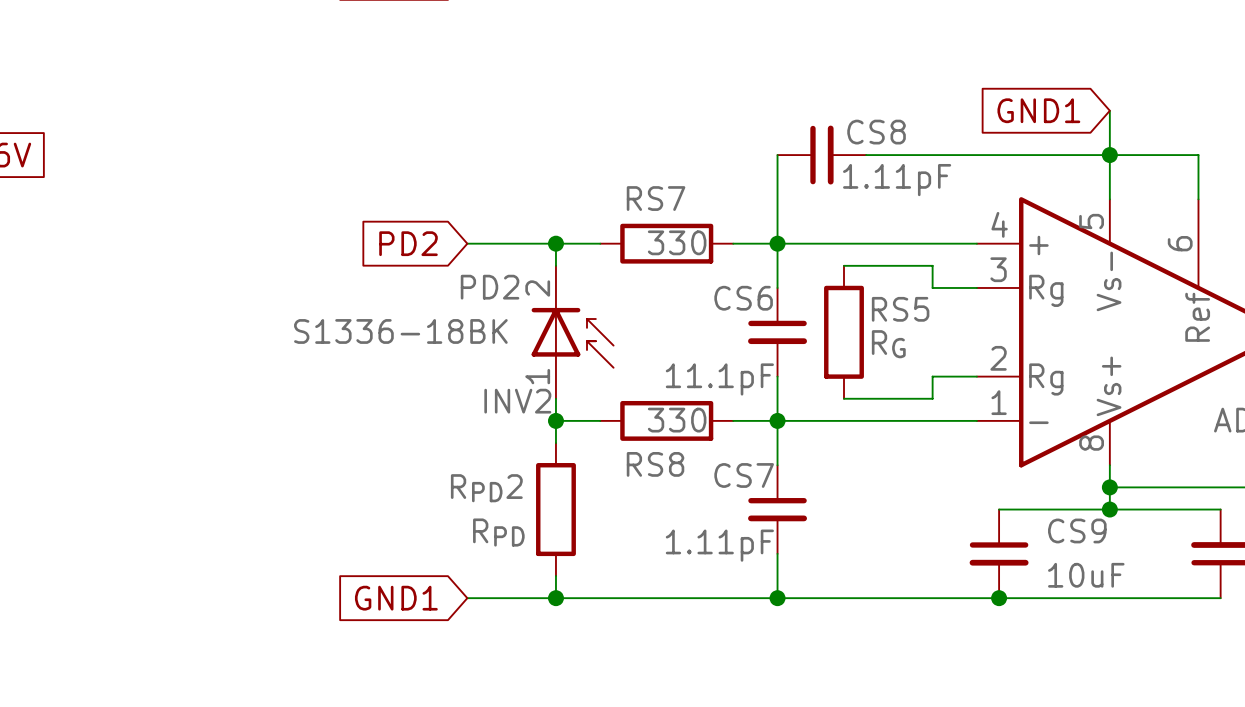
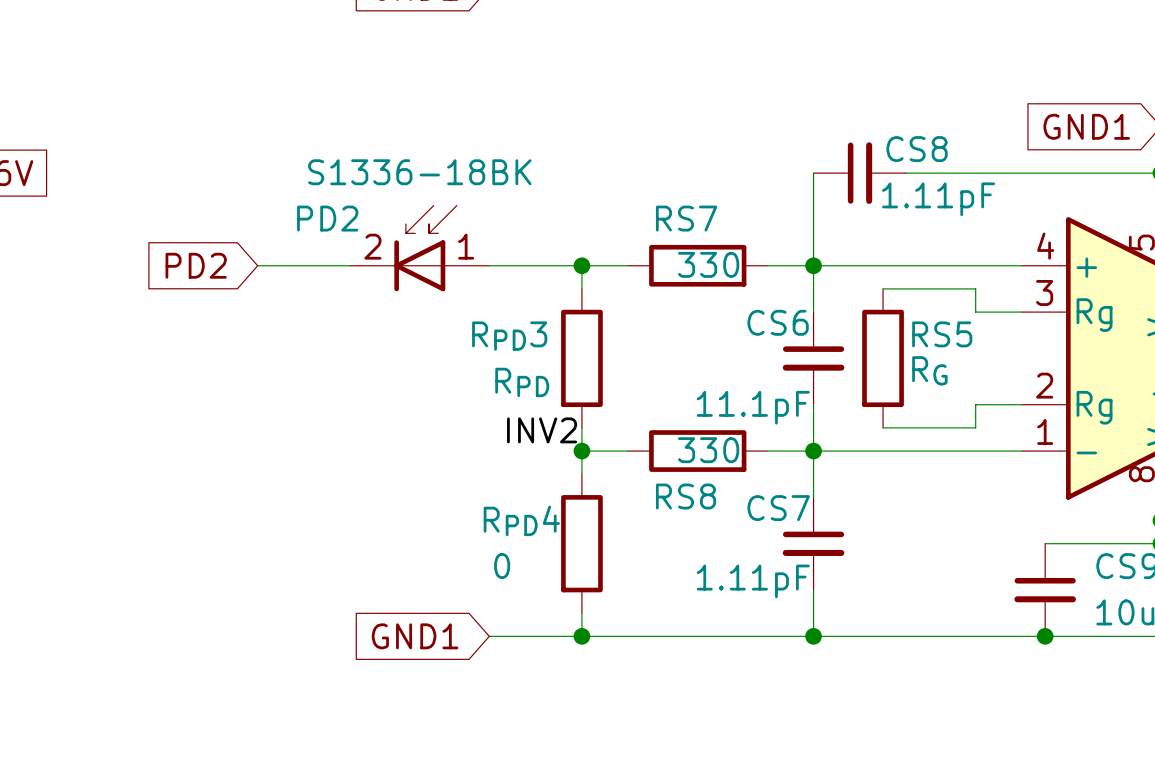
wire: none -> (257, 265) (350, 265)
global label position: PD2 (408, 243) -> PD2 (196, 265)
PD2 value position: S1336-18BK (400, 331) -> S1336-18BK (419, 172)
RPD3: none -> RPD (581, 358)
PD2 position: (572, 332) -> (419, 248)
PD2 rotation: 0° (572, 337) -> 90° counterclockwise (425, 248)
RPD2 name: RPD2 (486, 488) -> RPD4 (521, 520)
RPD2 value: RPD (498, 532) -> 0 (502, 565)

